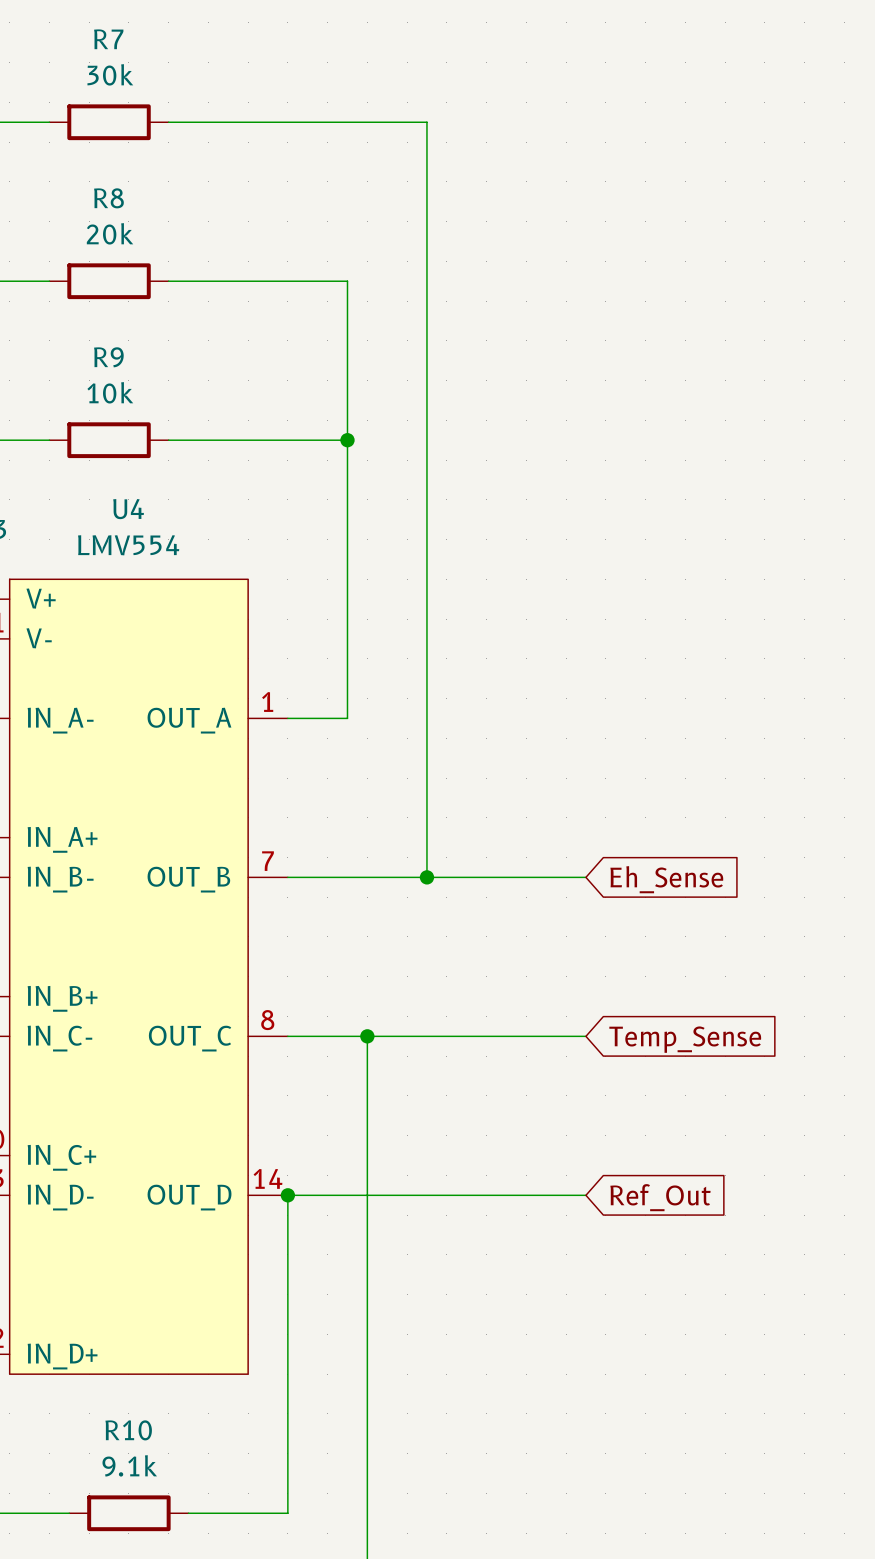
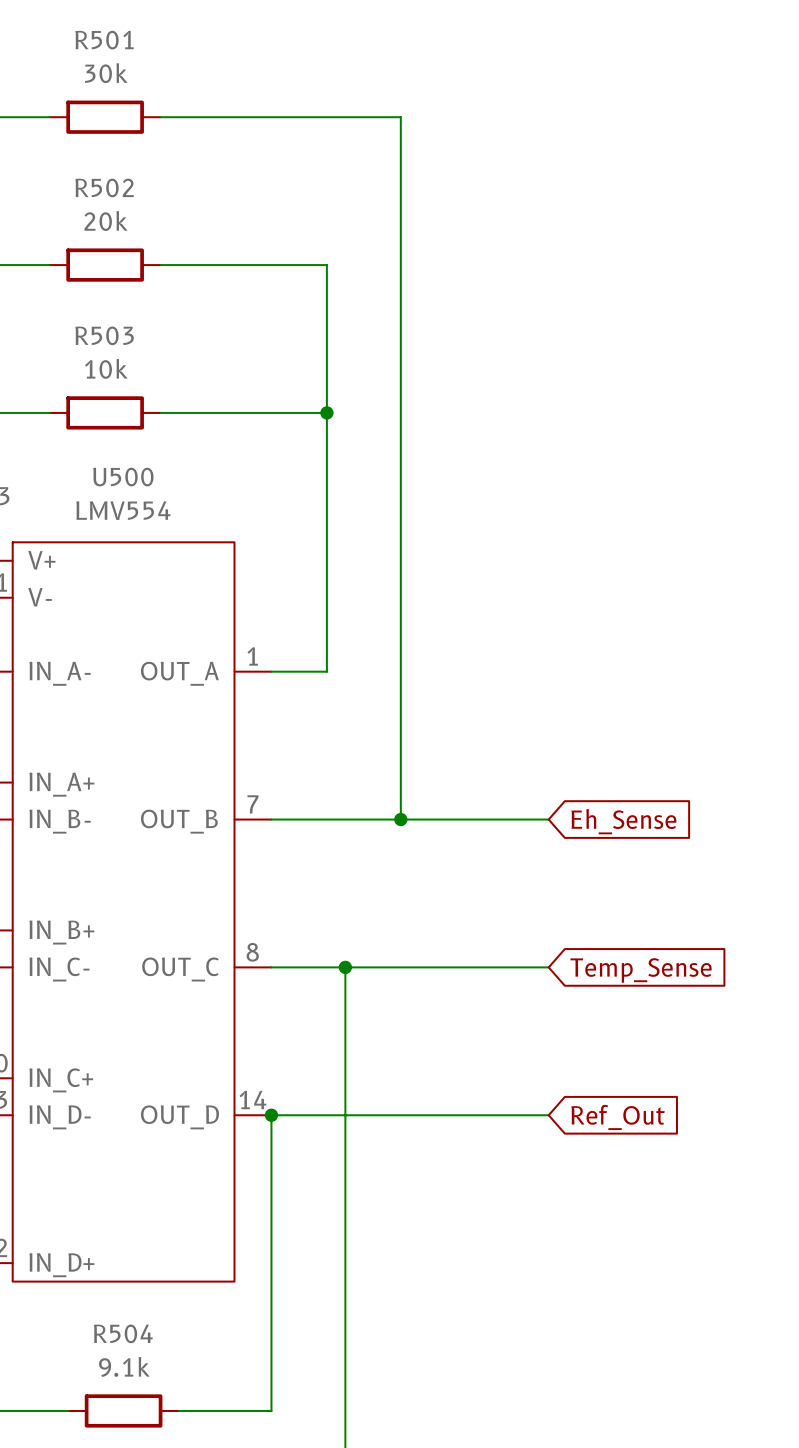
R7 name: R7 (108, 39) -> R501 (104, 40)
R8 name: R8 (108, 198) -> R502 (104, 187)
R9 name: R9 (108, 357) -> R503 (104, 335)
U4 name: U4 (128, 509) -> U500 (123, 477)
R10 name: R10 (128, 1430) -> R504 (123, 1333)

